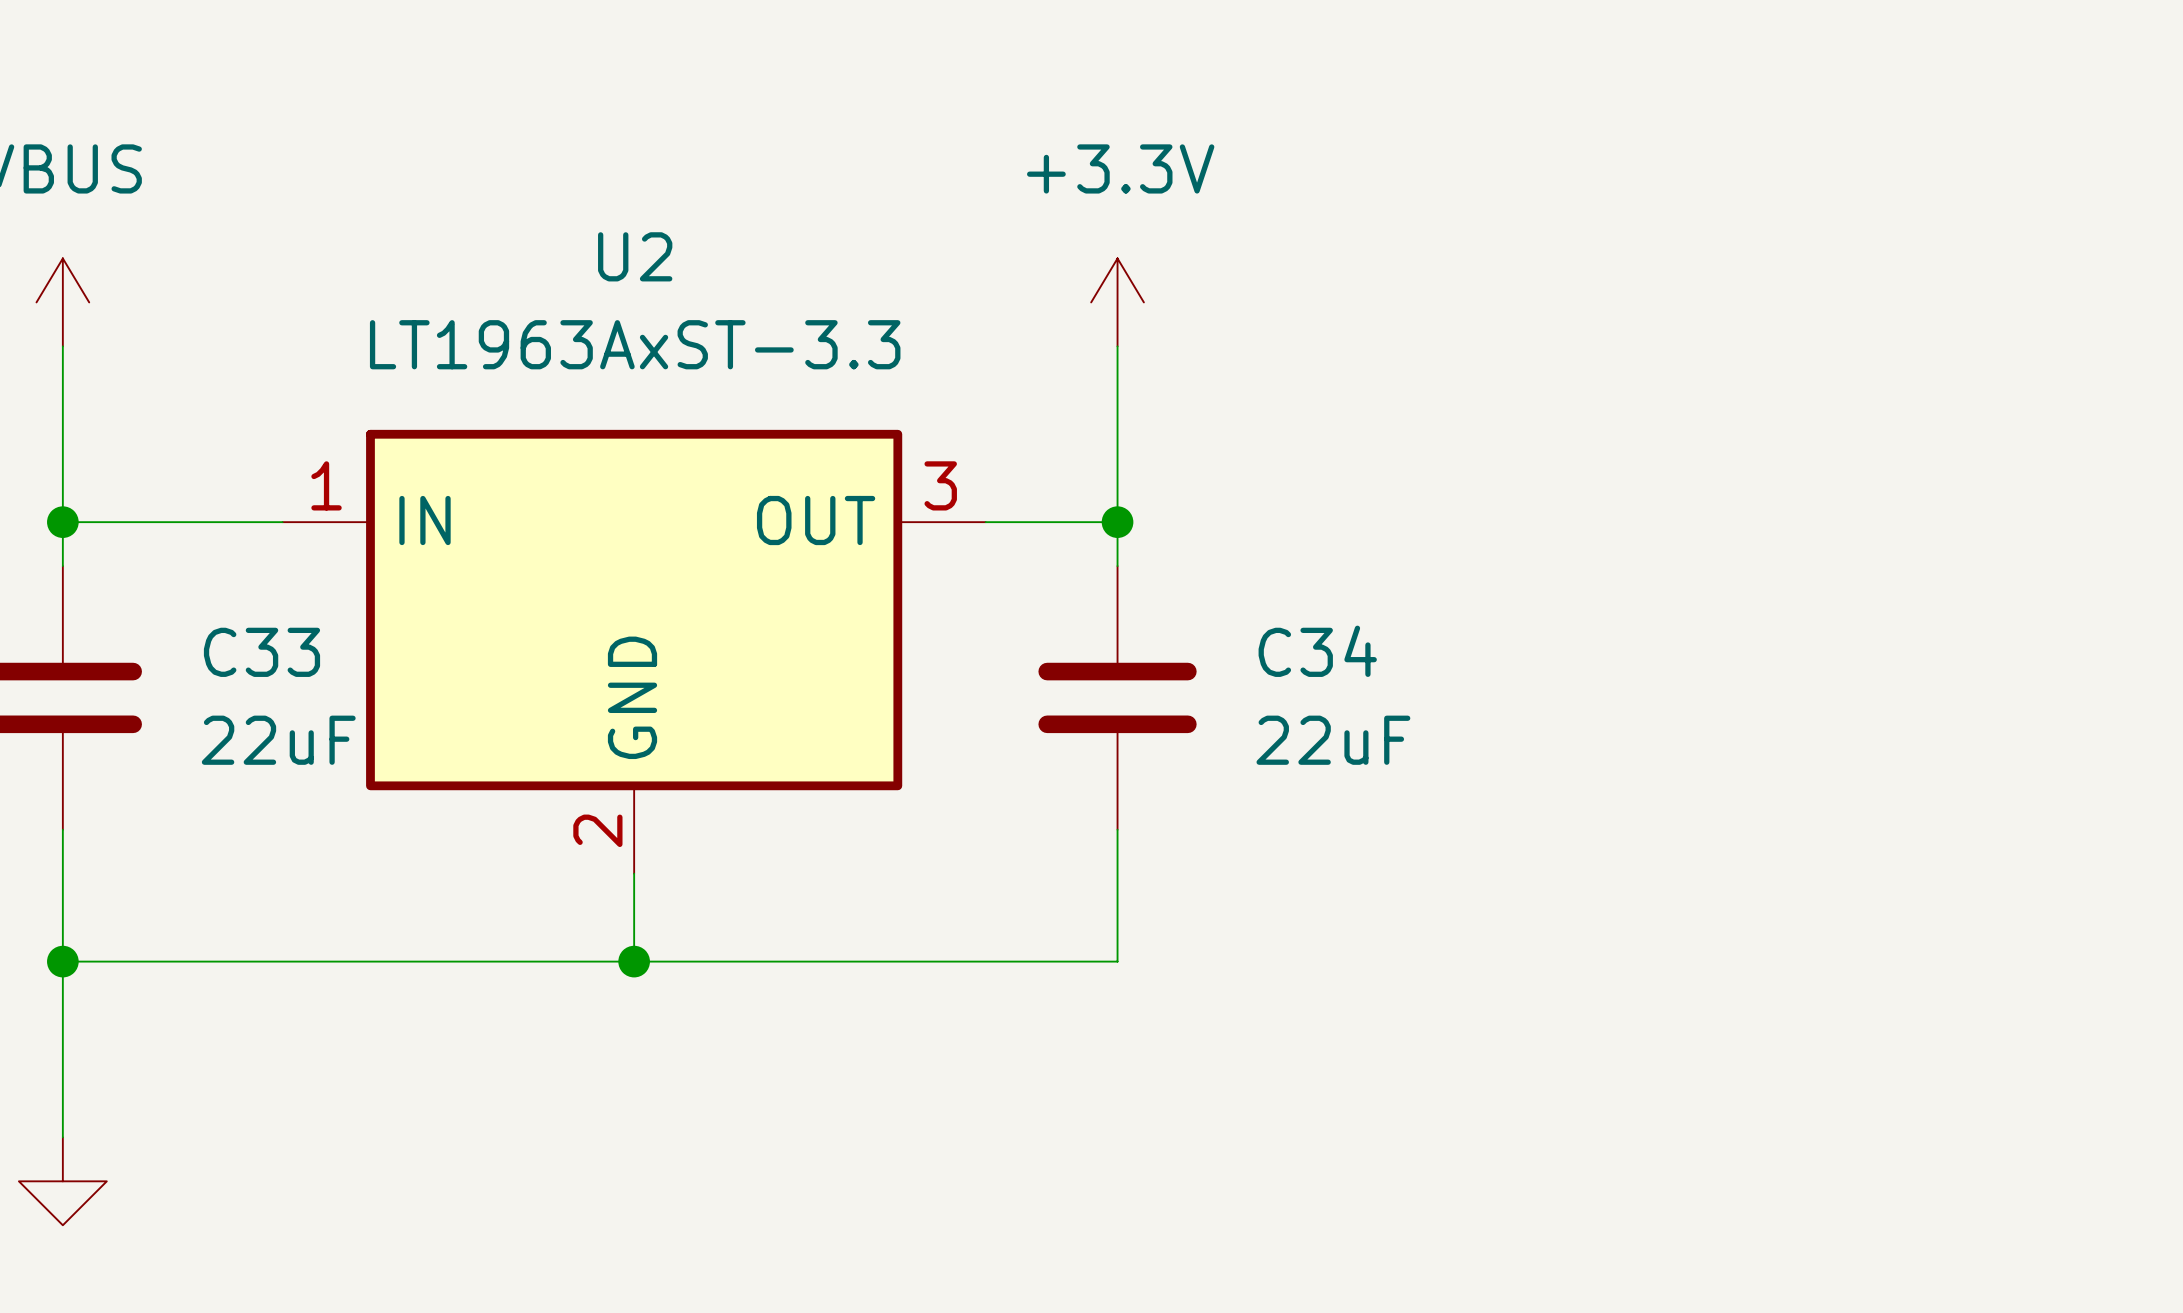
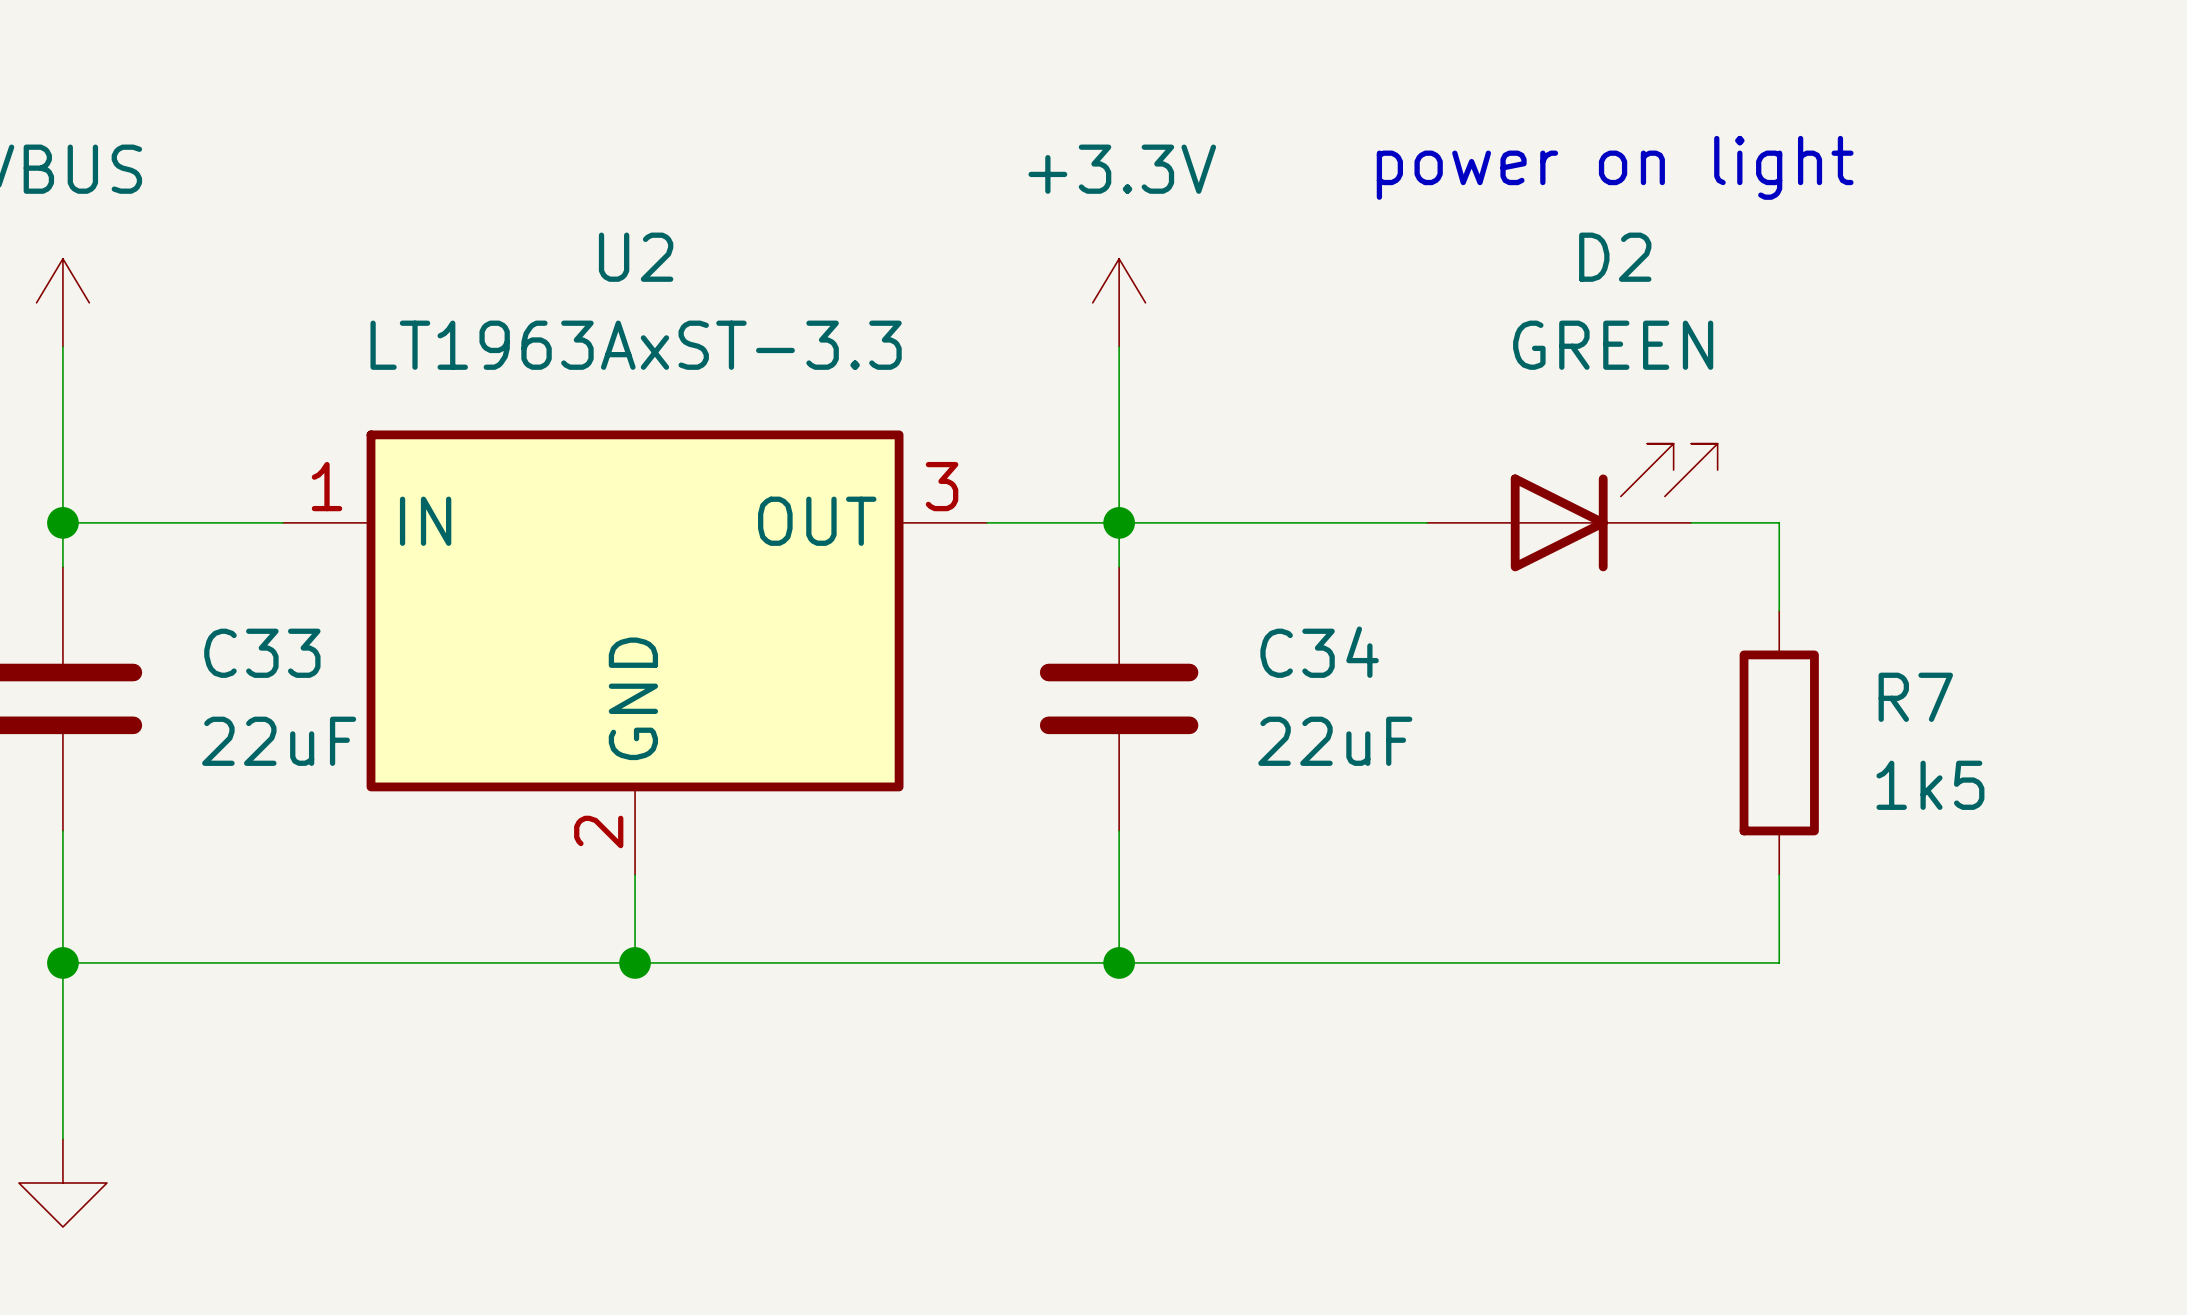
text: none -> power on light (1615, 167)
D2: none -> GREEN (1572, 507)
wire: none -> (1119, 522) (1427, 522)
wire: none -> (1691, 522) (1779, 522) (1779, 610)
R7: none -> 1k5 (1779, 742)
wire: none -> (1779, 874) (1779, 962) (1119, 962)
junction: none -> (1119, 962)

